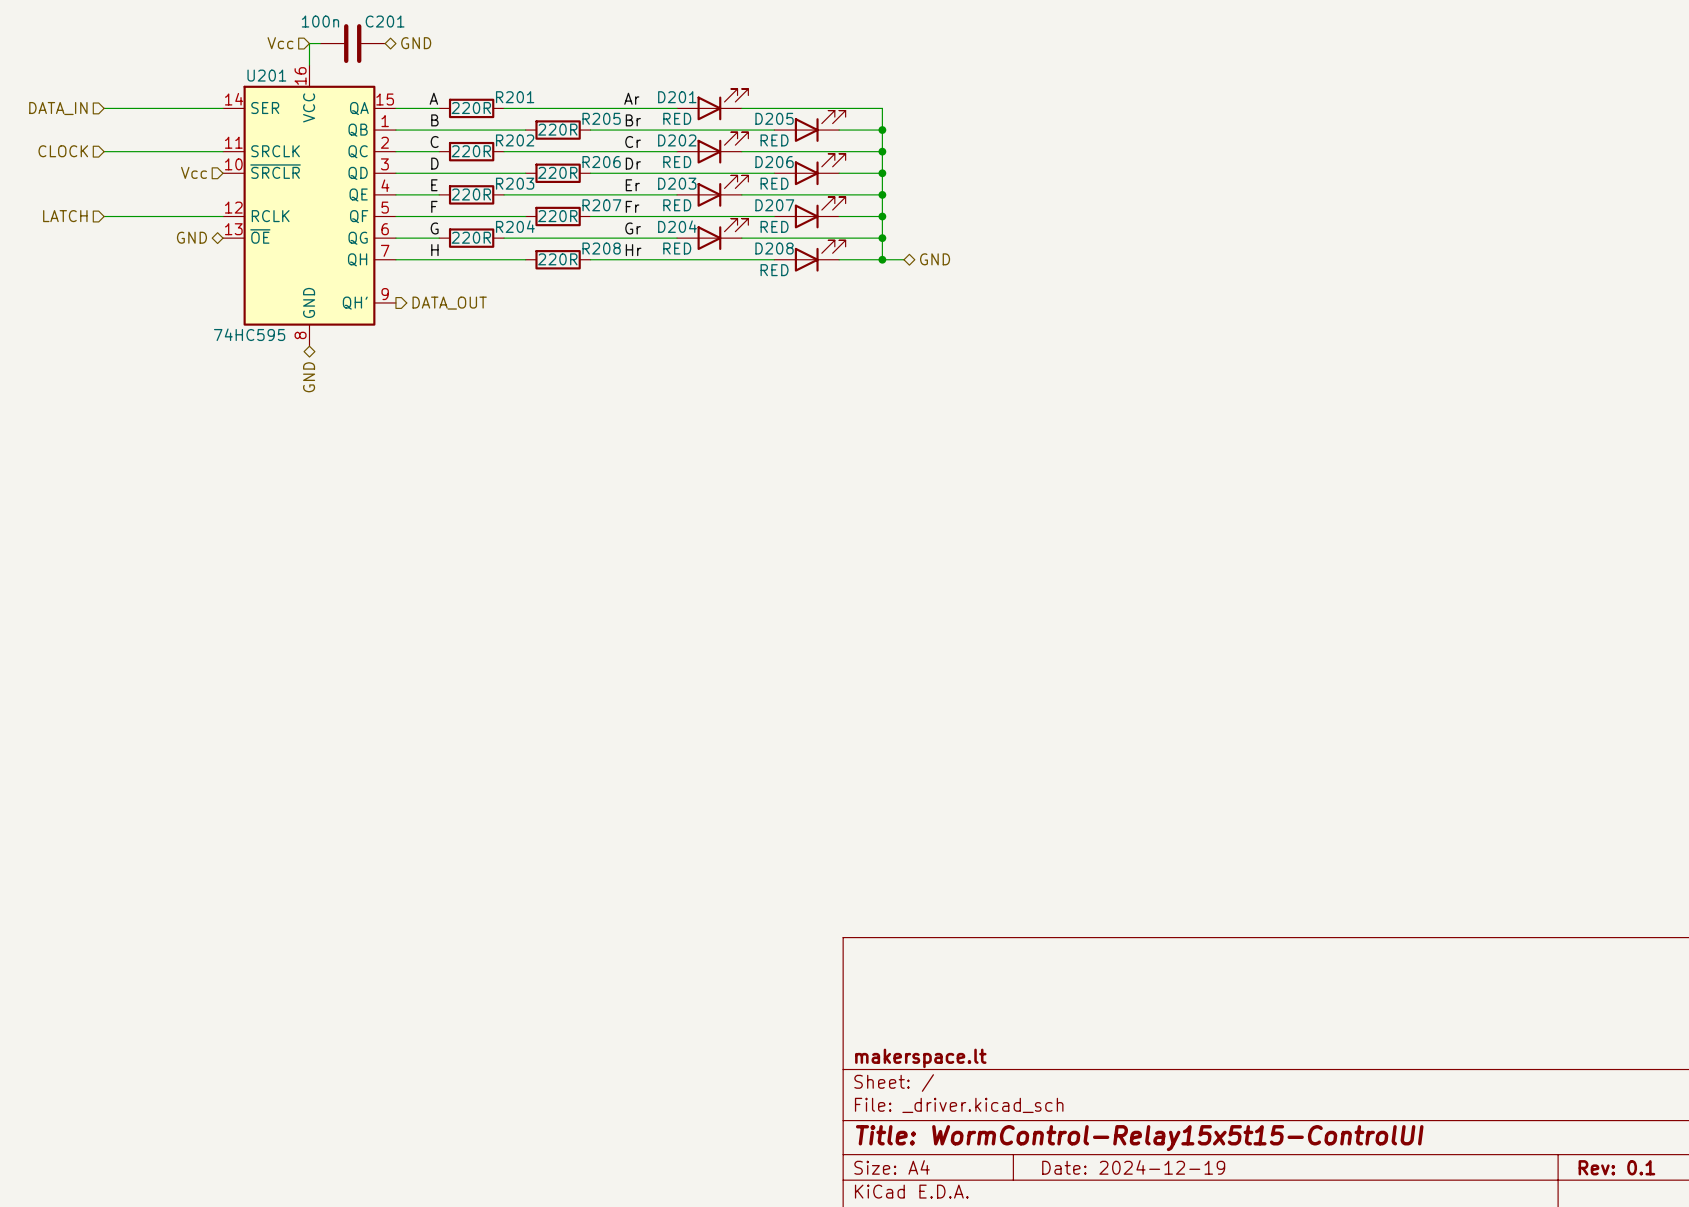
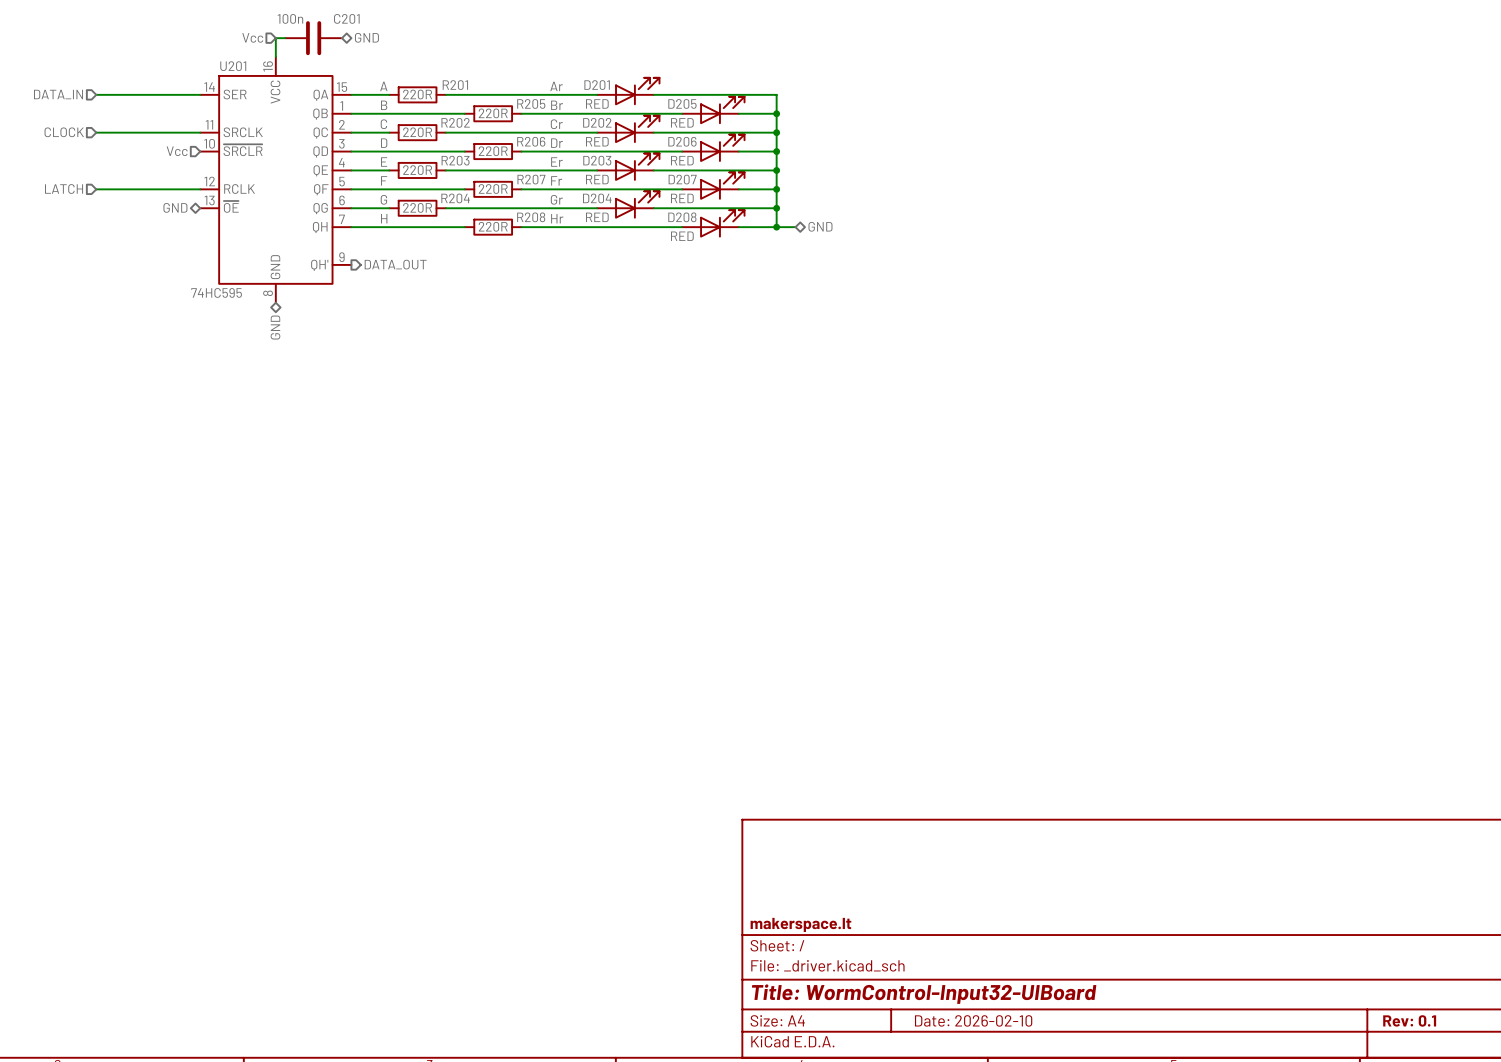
title block: Title: WormControl-Relay15x5t15-ControlUI (1139, 1138) -> Title: WormControl-Input32-UIBoard (924, 994)
title block: Date: 2024-12-19 (1133, 1167) -> Date: 2026-02-10 (973, 1020)

